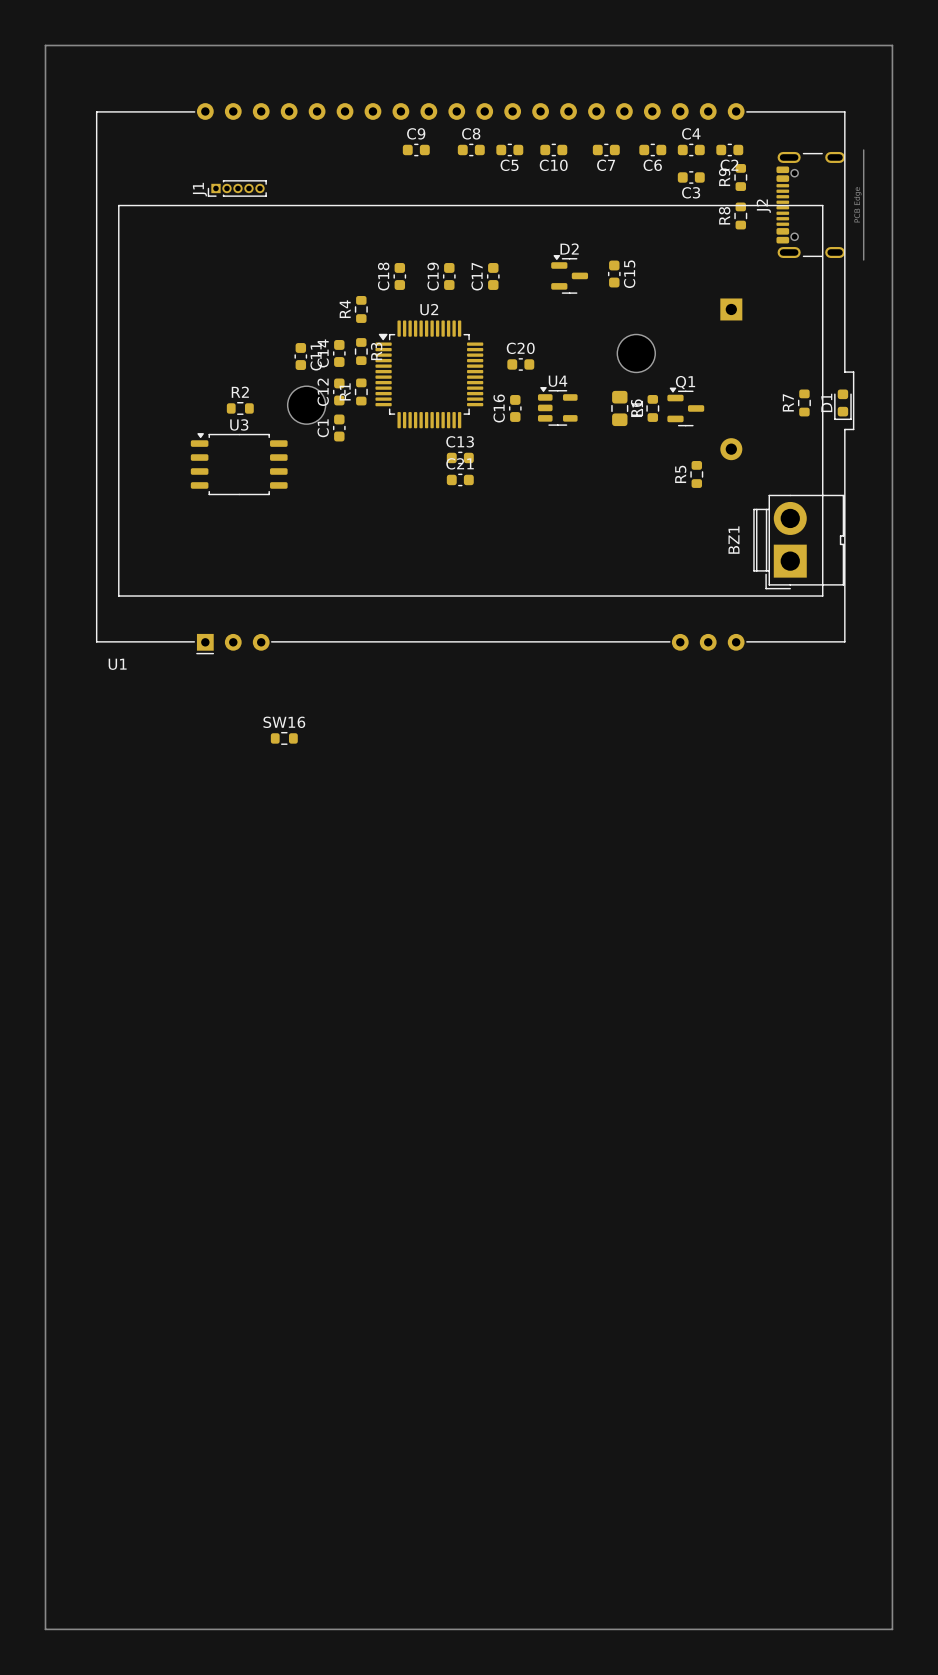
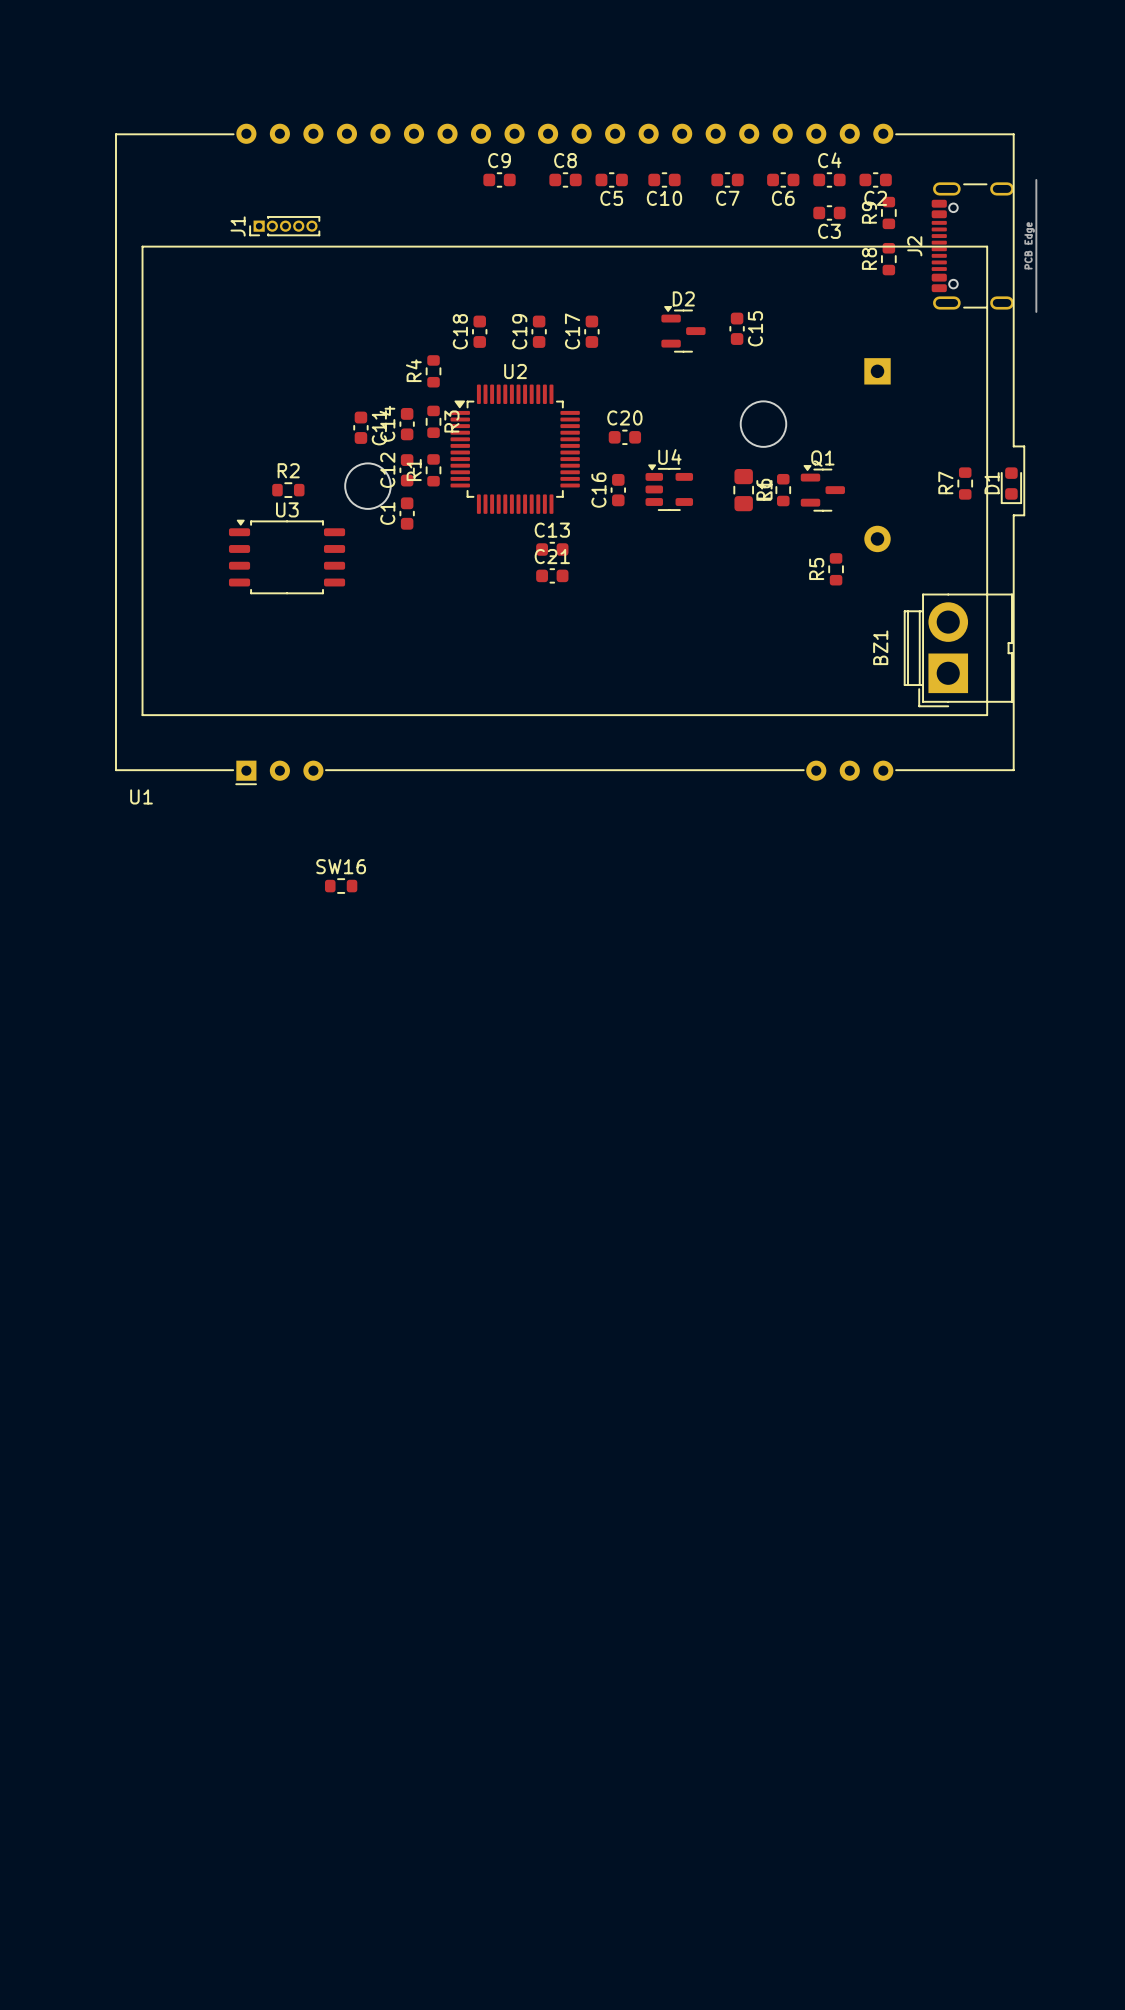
line: (45, 45) (892, 45) (892, 1629) (45, 1629) (45, 45) -> none

